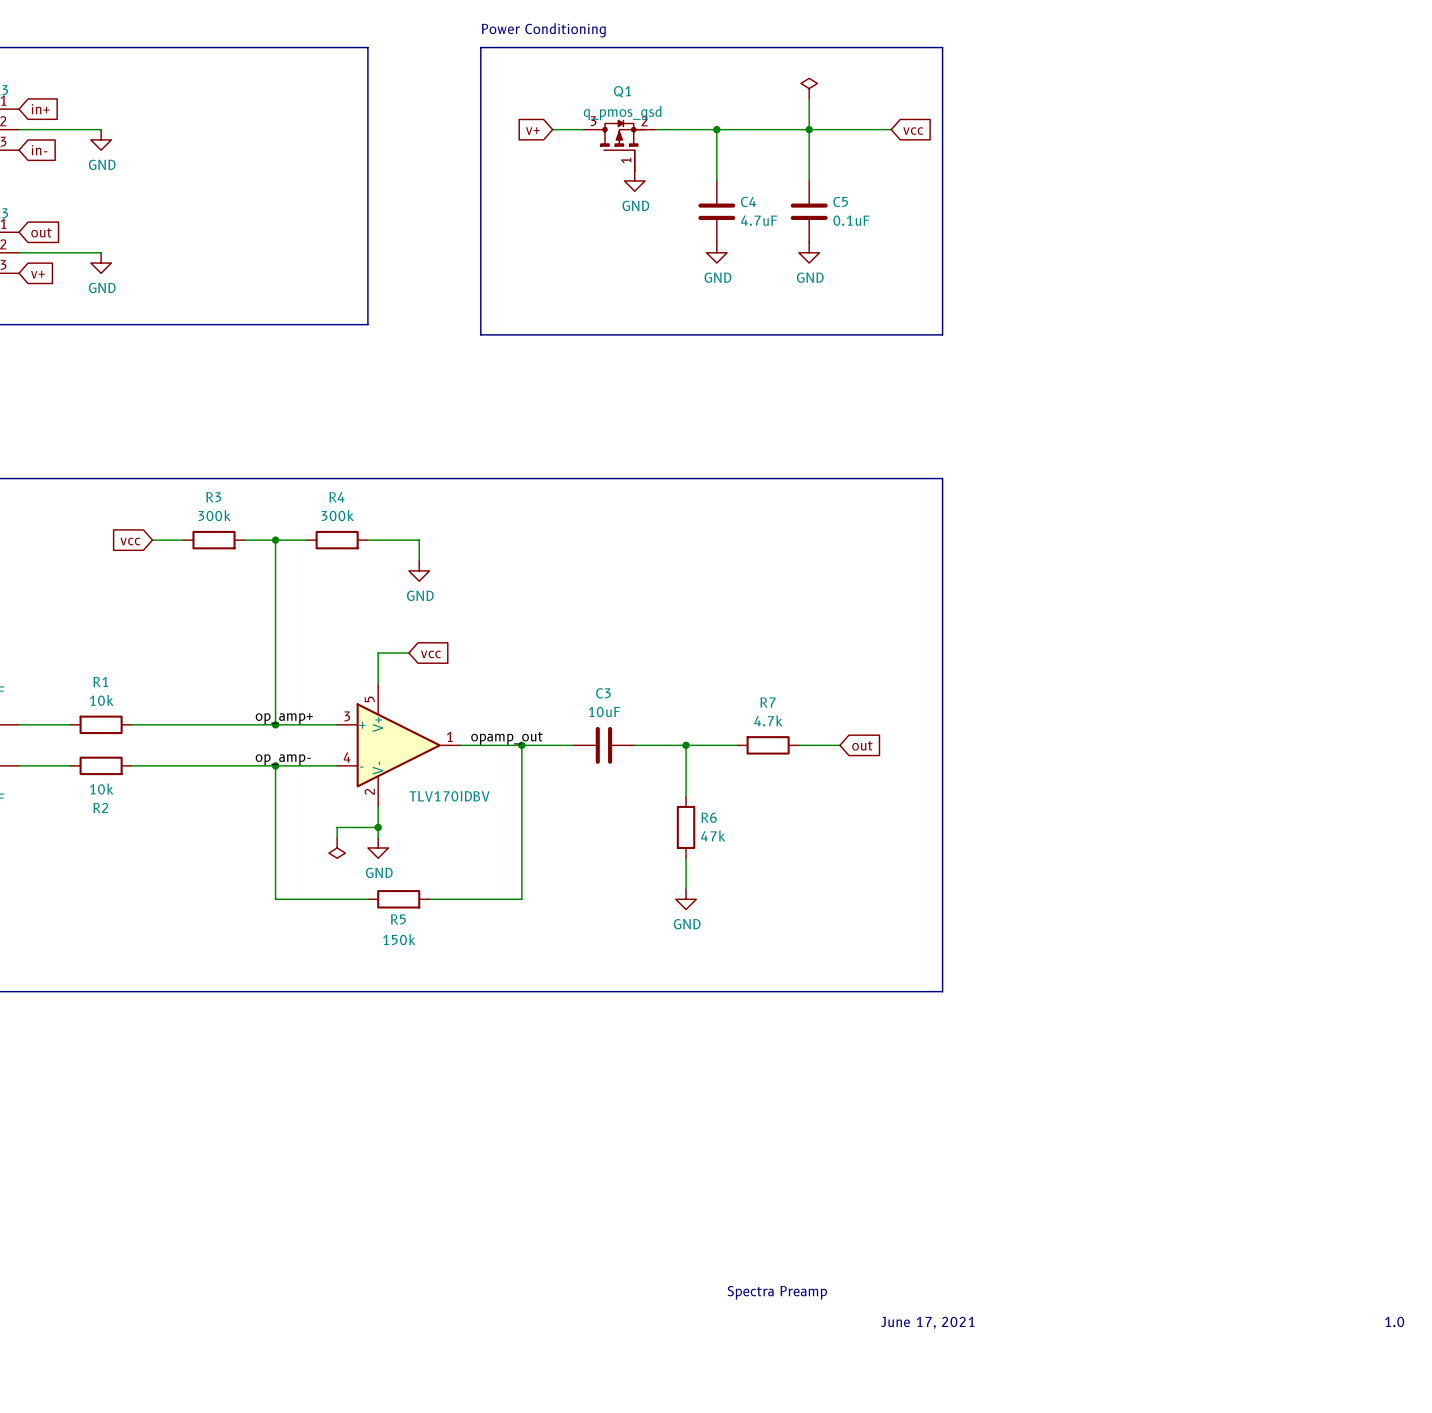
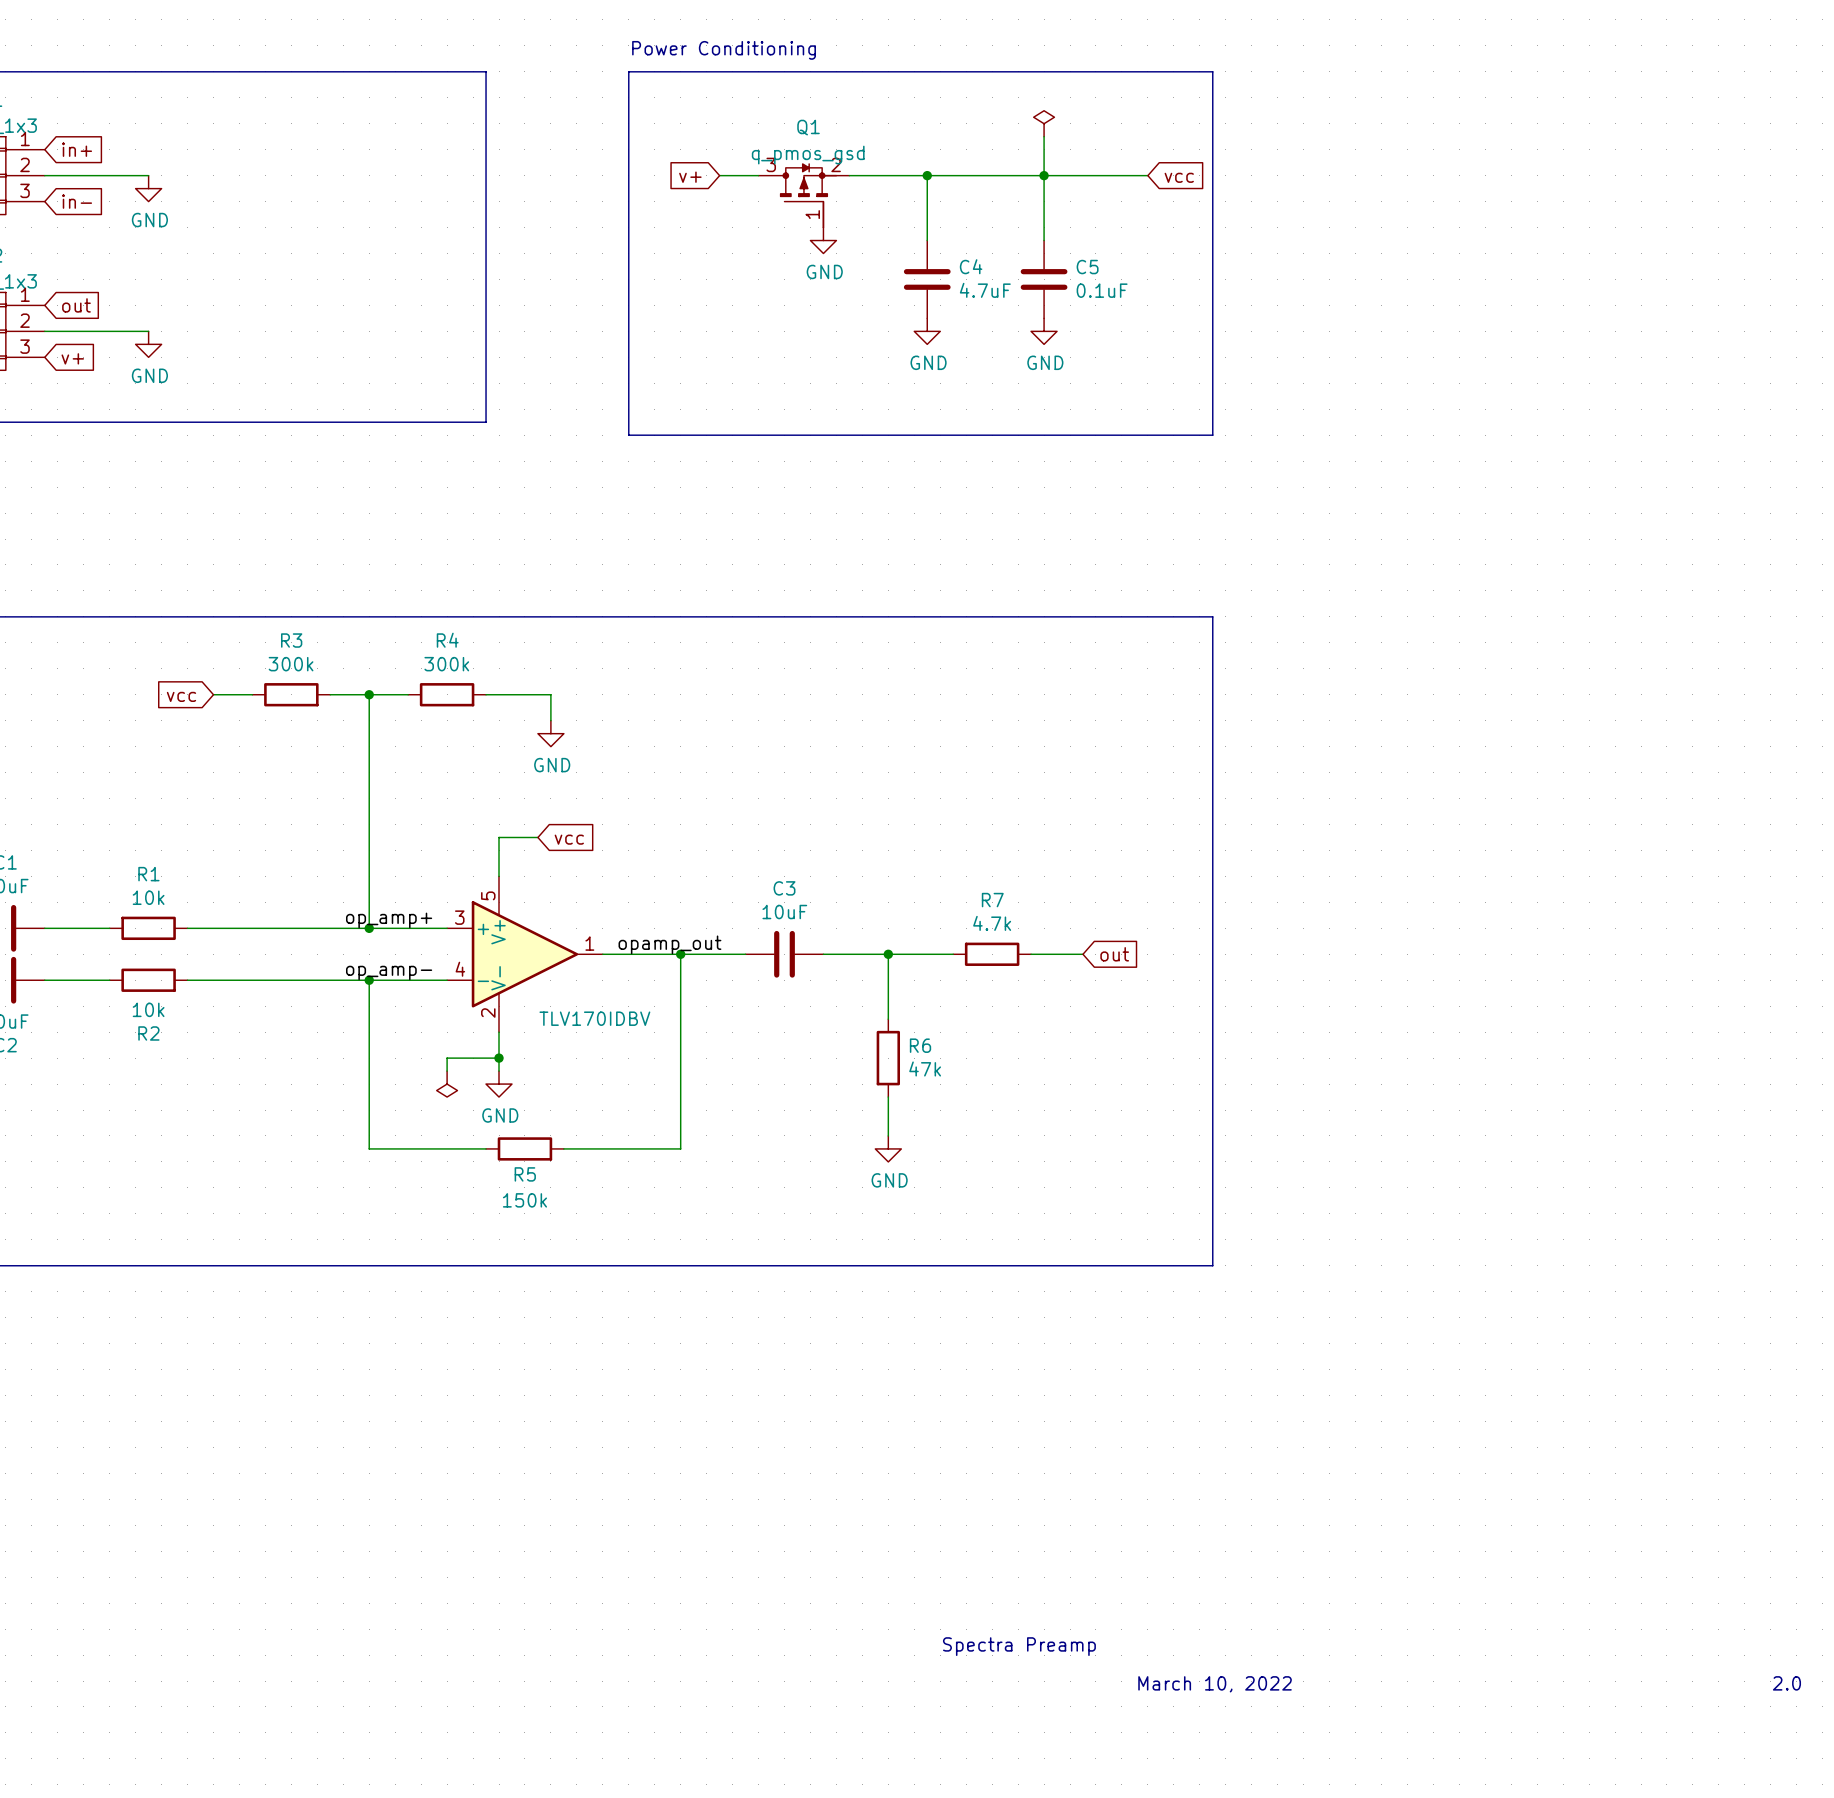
text: 1.0 (1394, 1321) -> 2.0 (1786, 1683)
text: June 17, 2021 (927, 1322) -> March 10, 2022 (1215, 1684)

